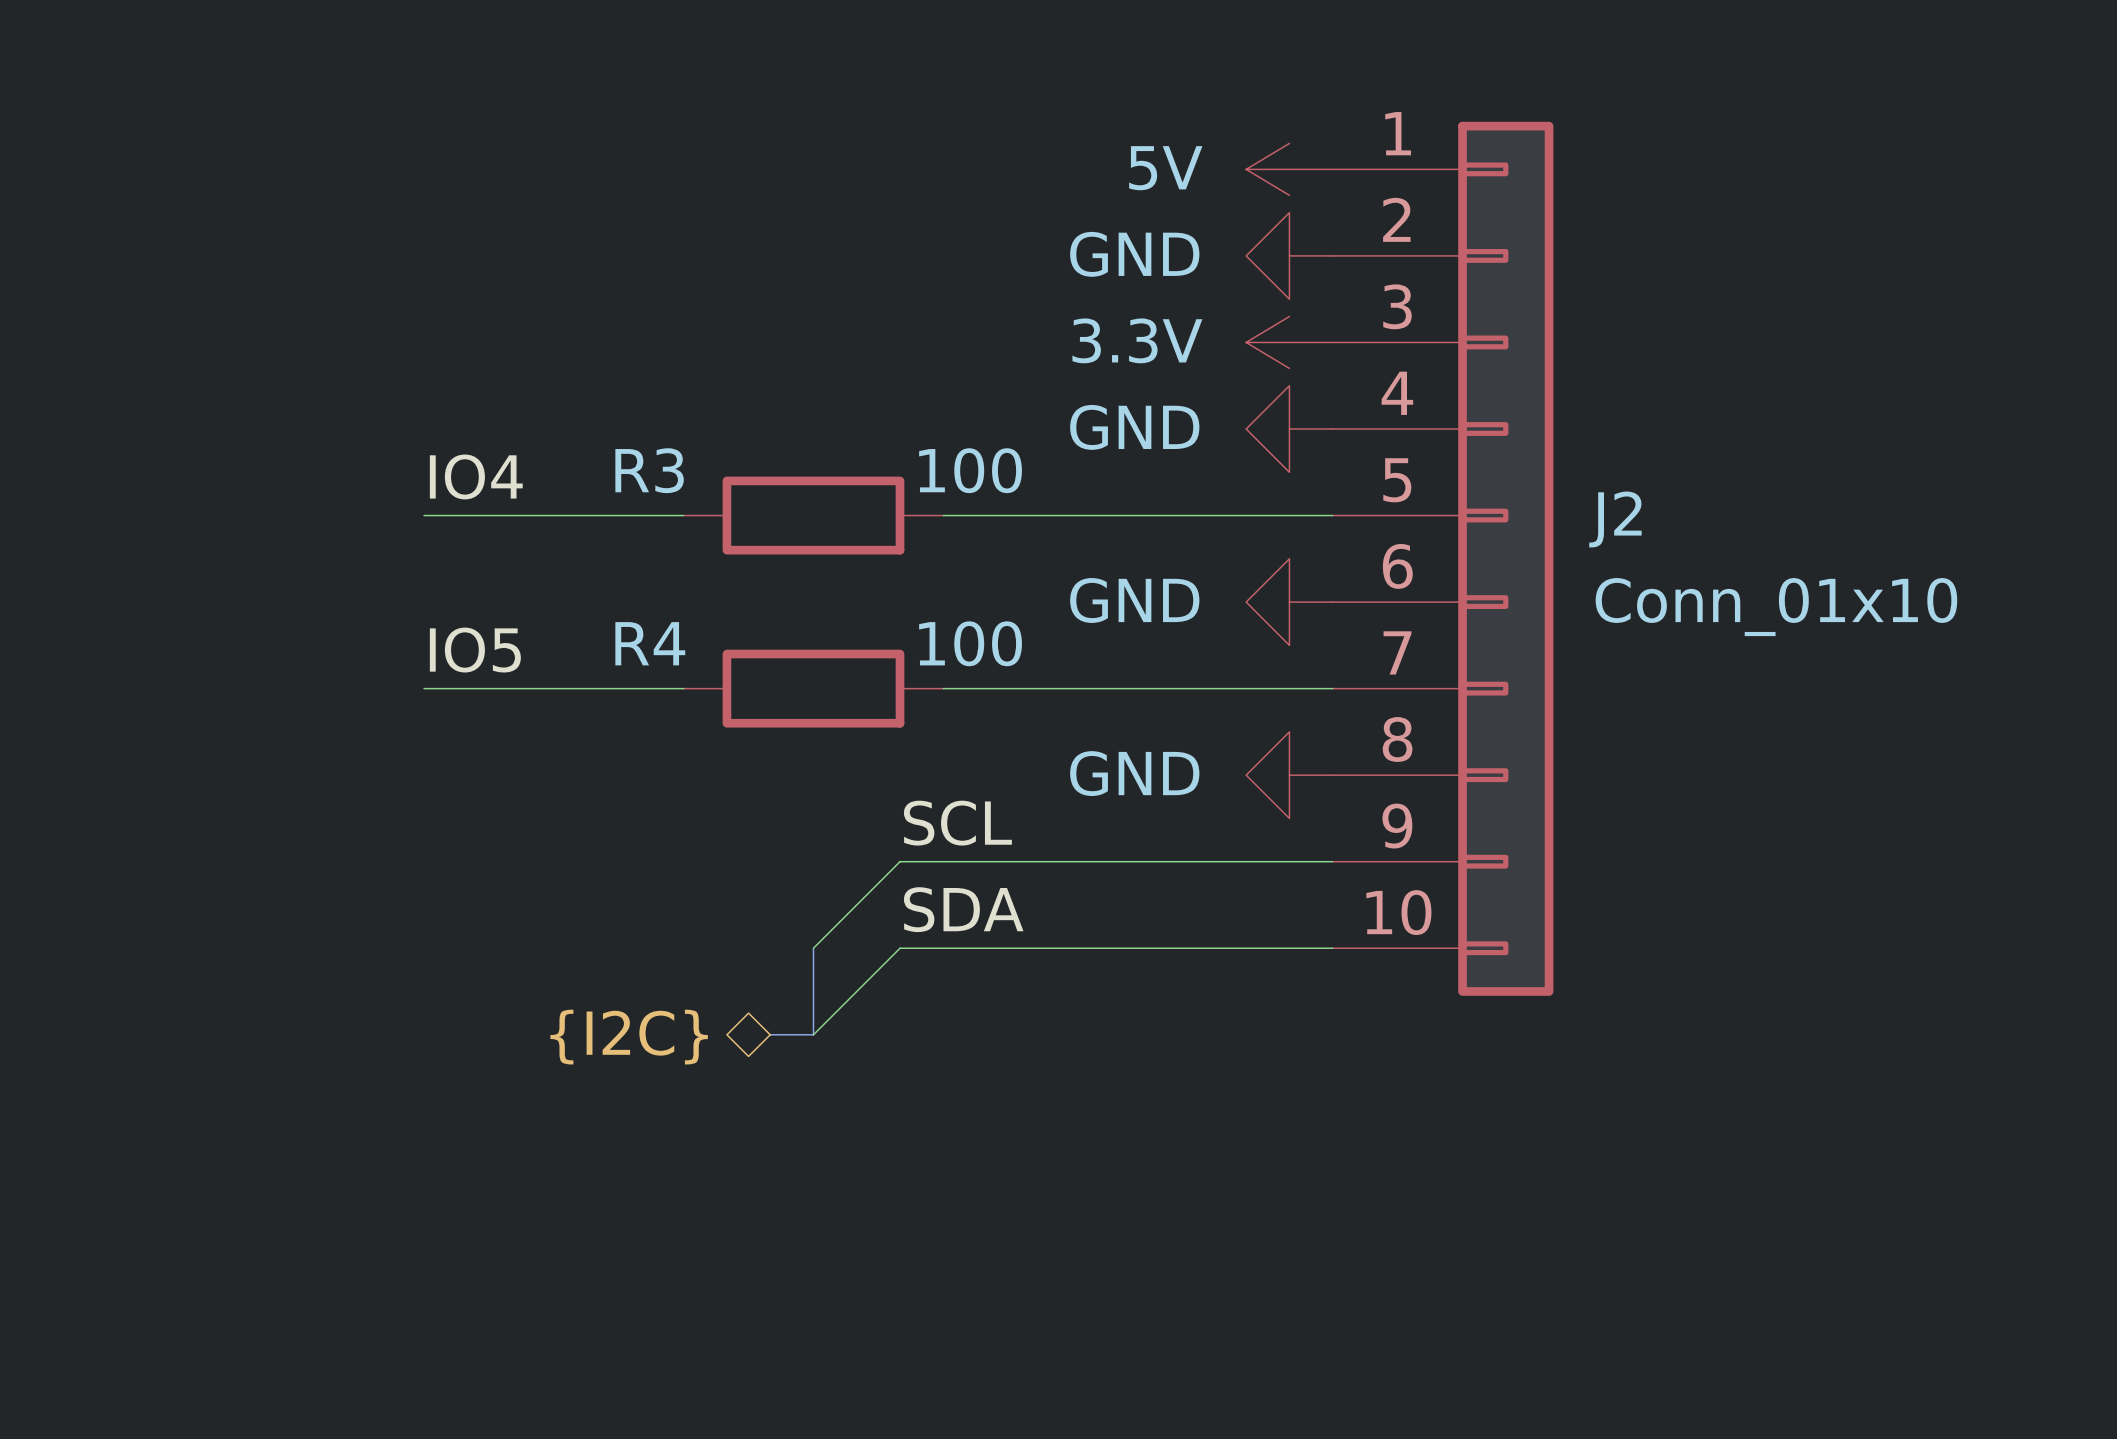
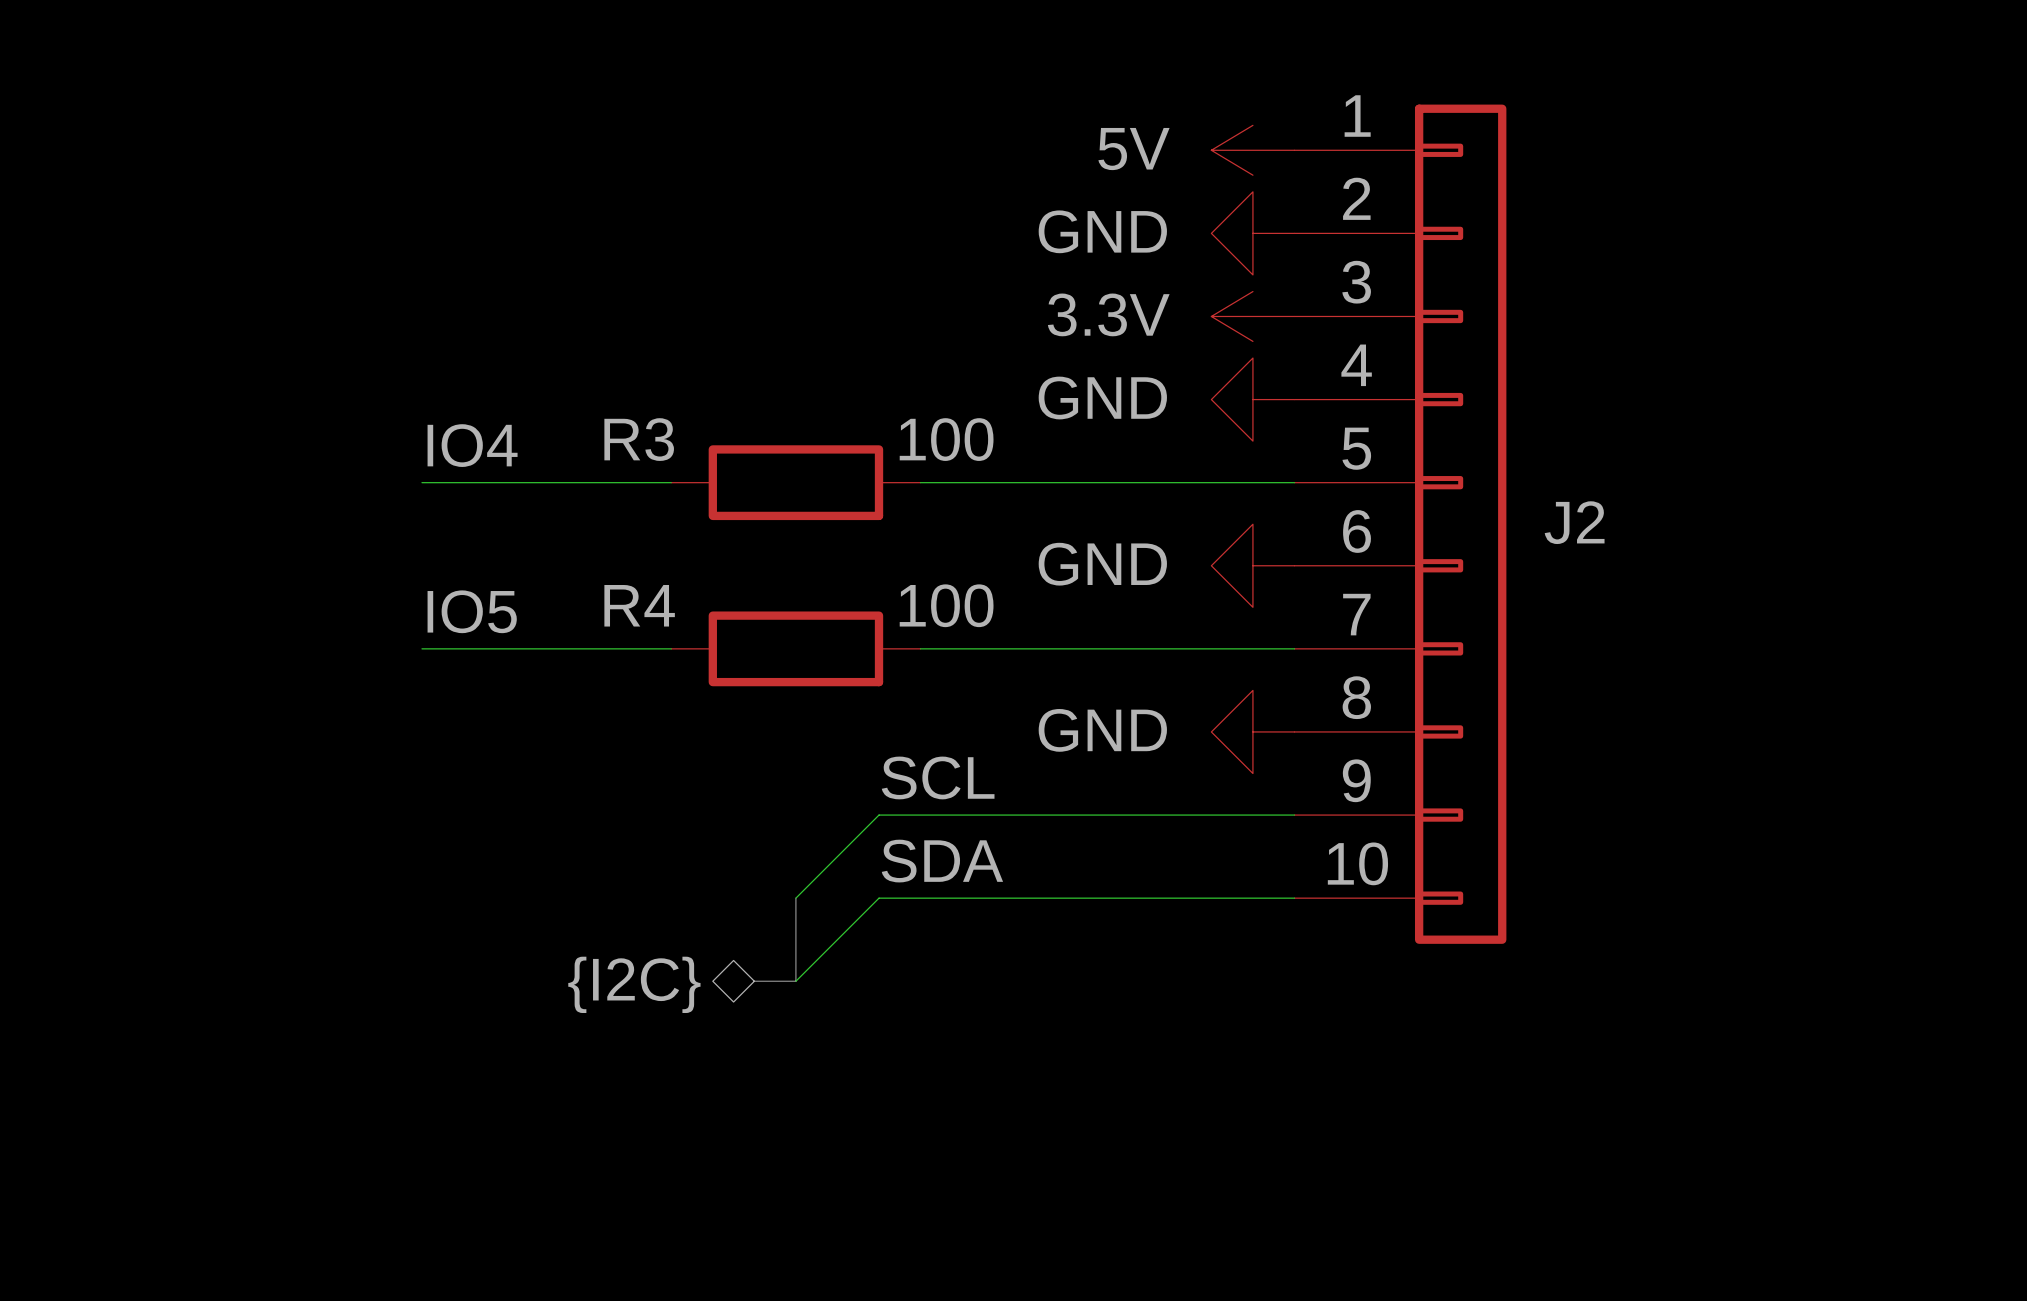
J2 name position: J2 (1615, 519) -> J2 (1574, 522)
J2 value: Conn_01x10 (1776, 607) -> none

